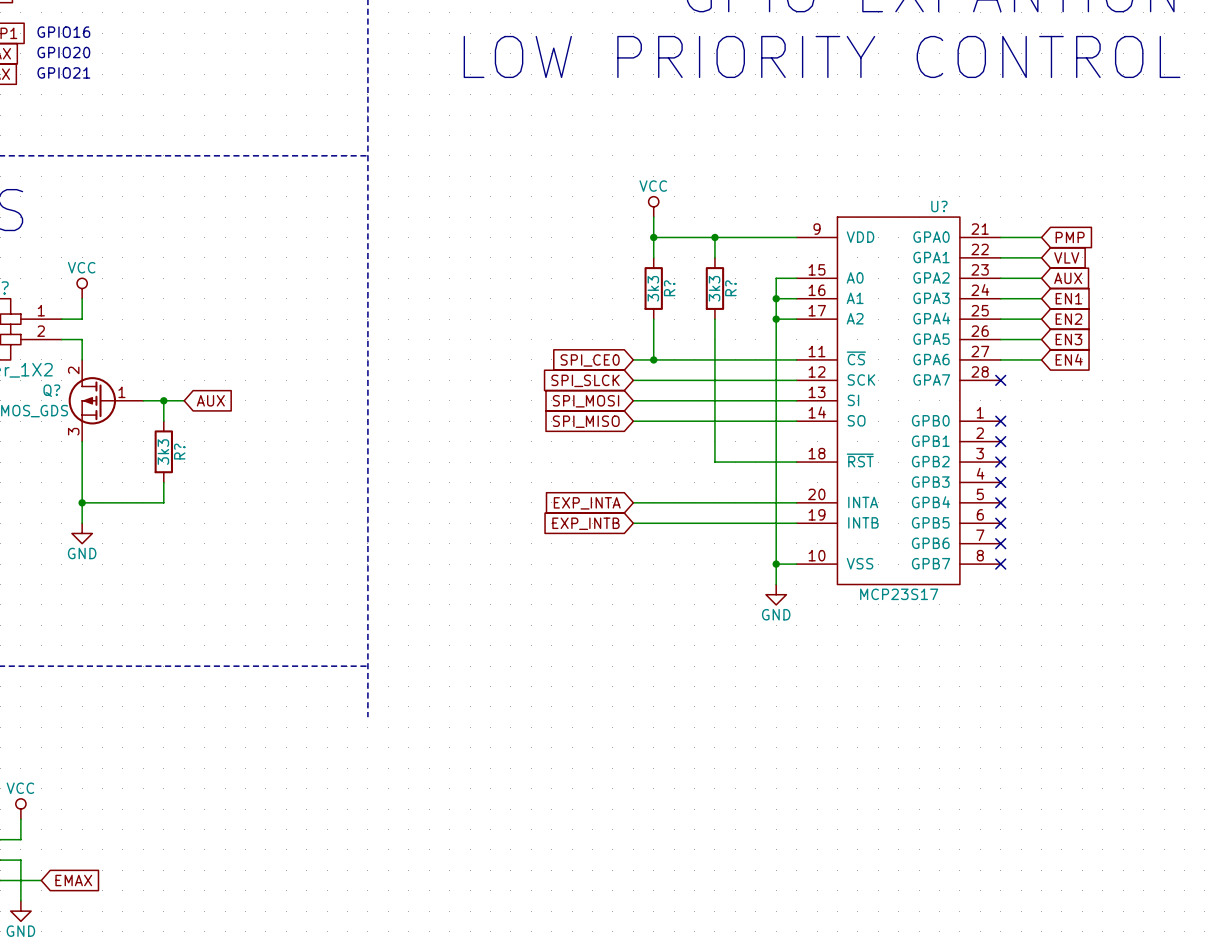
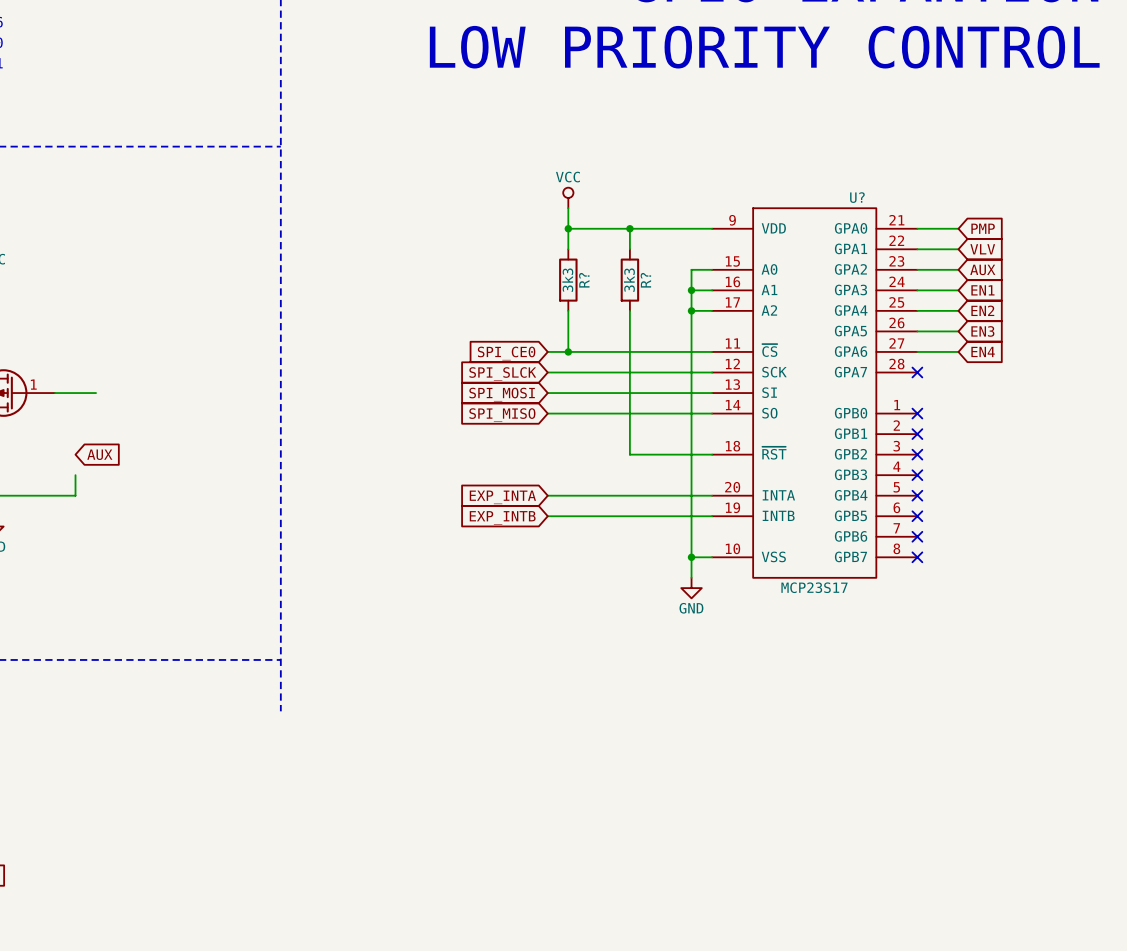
wire: (163, 400) (163, 421) -> none
junction: (163, 400) -> none
global label position: AUX (210, 400) -> AUX (99, 454)
R?: 3k3 (163, 451) -> none

